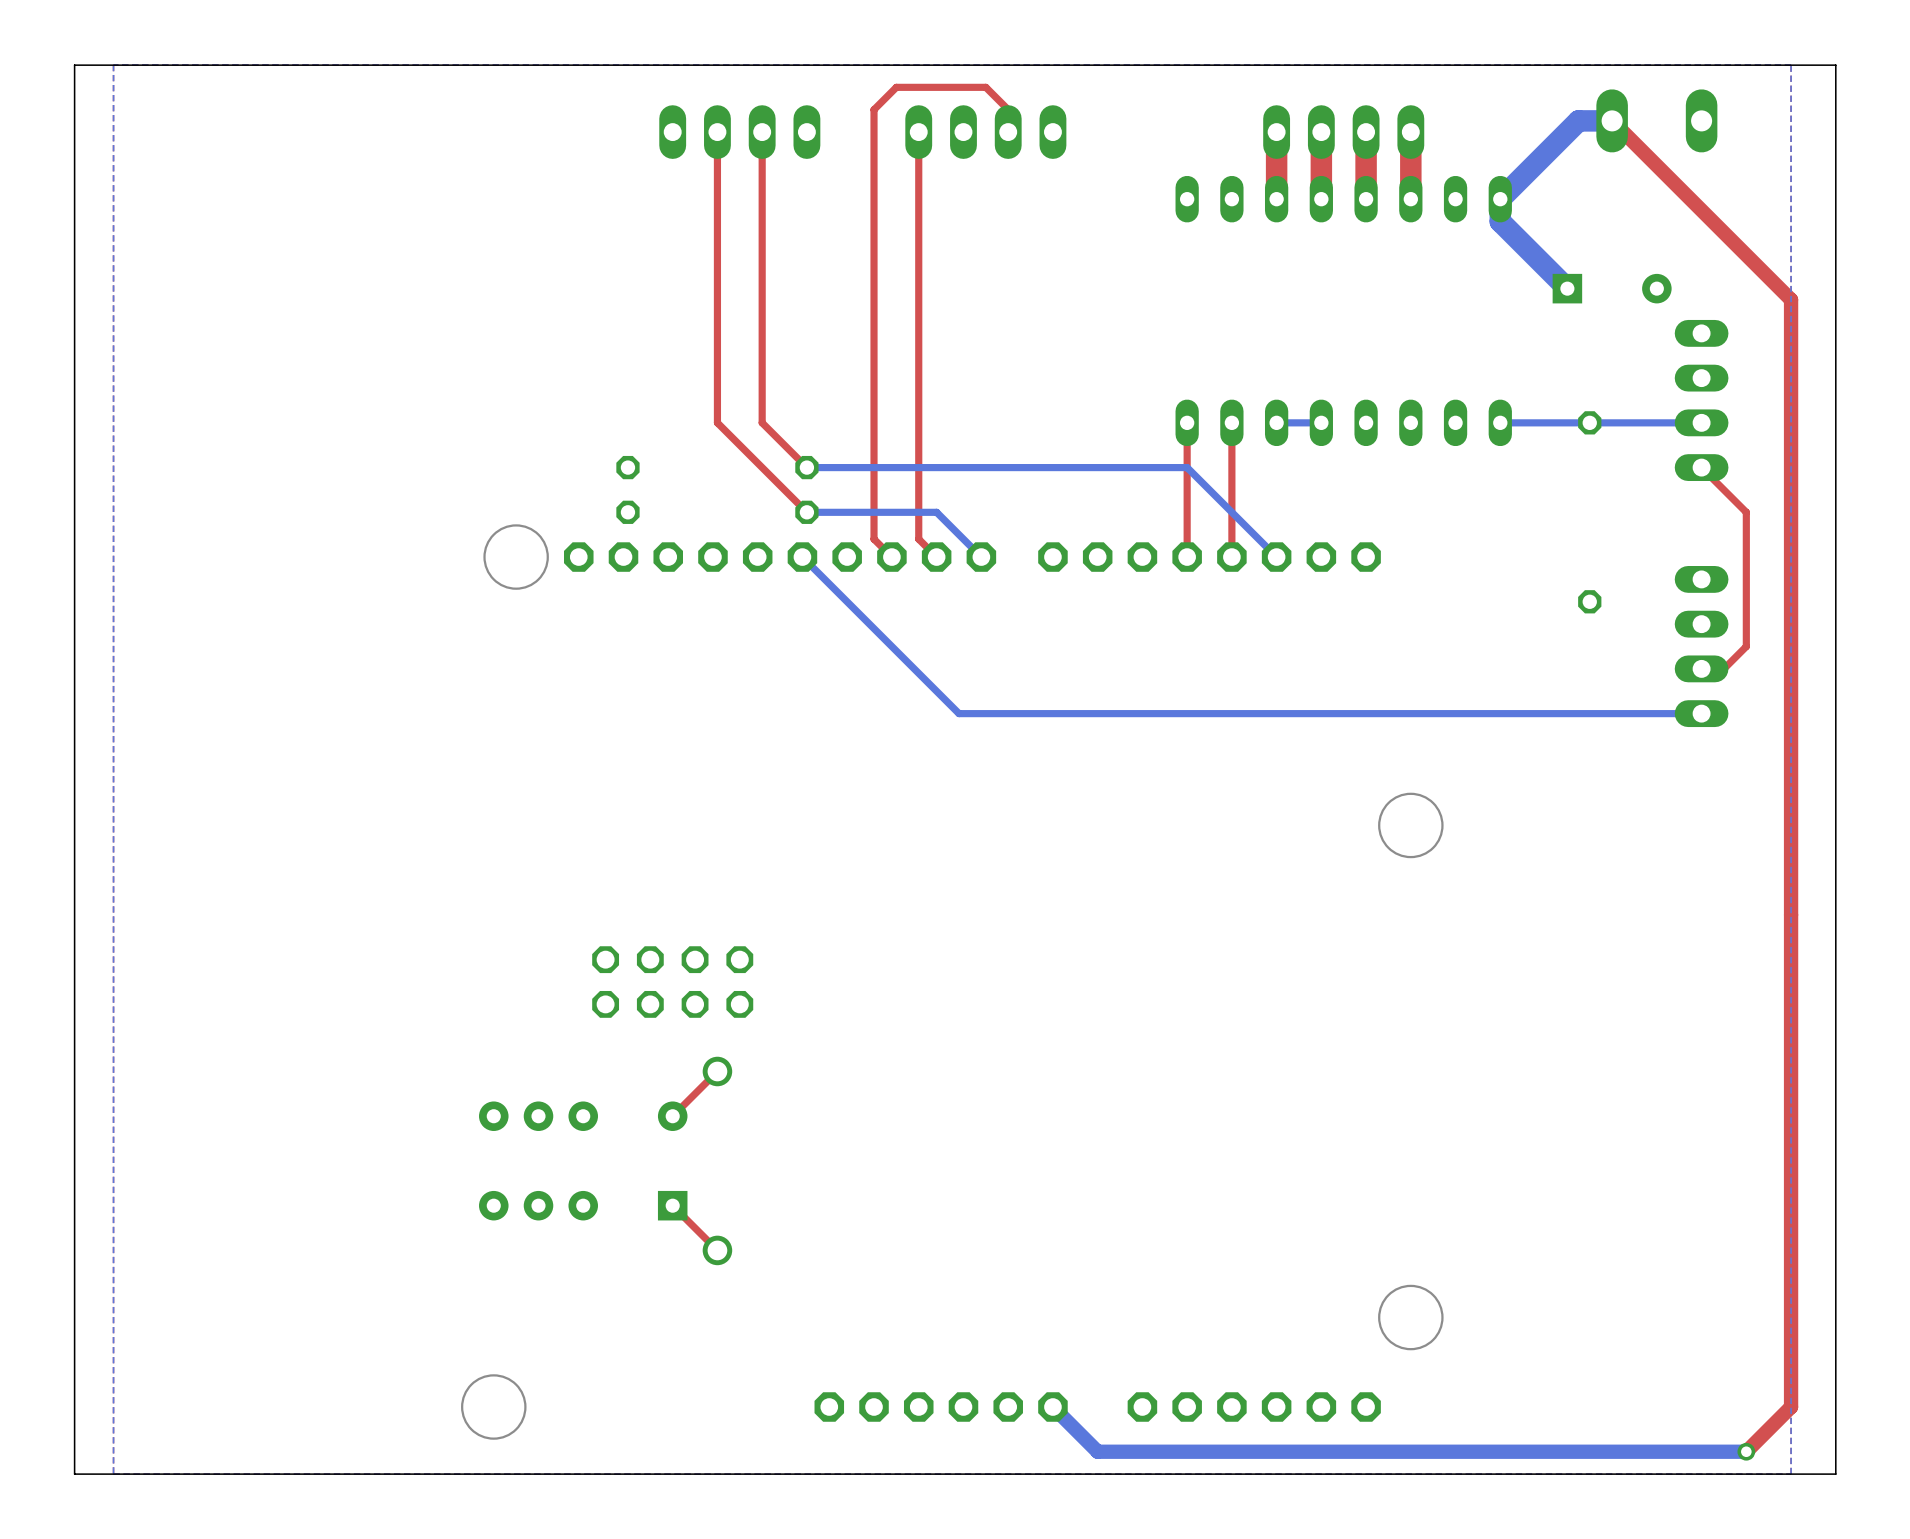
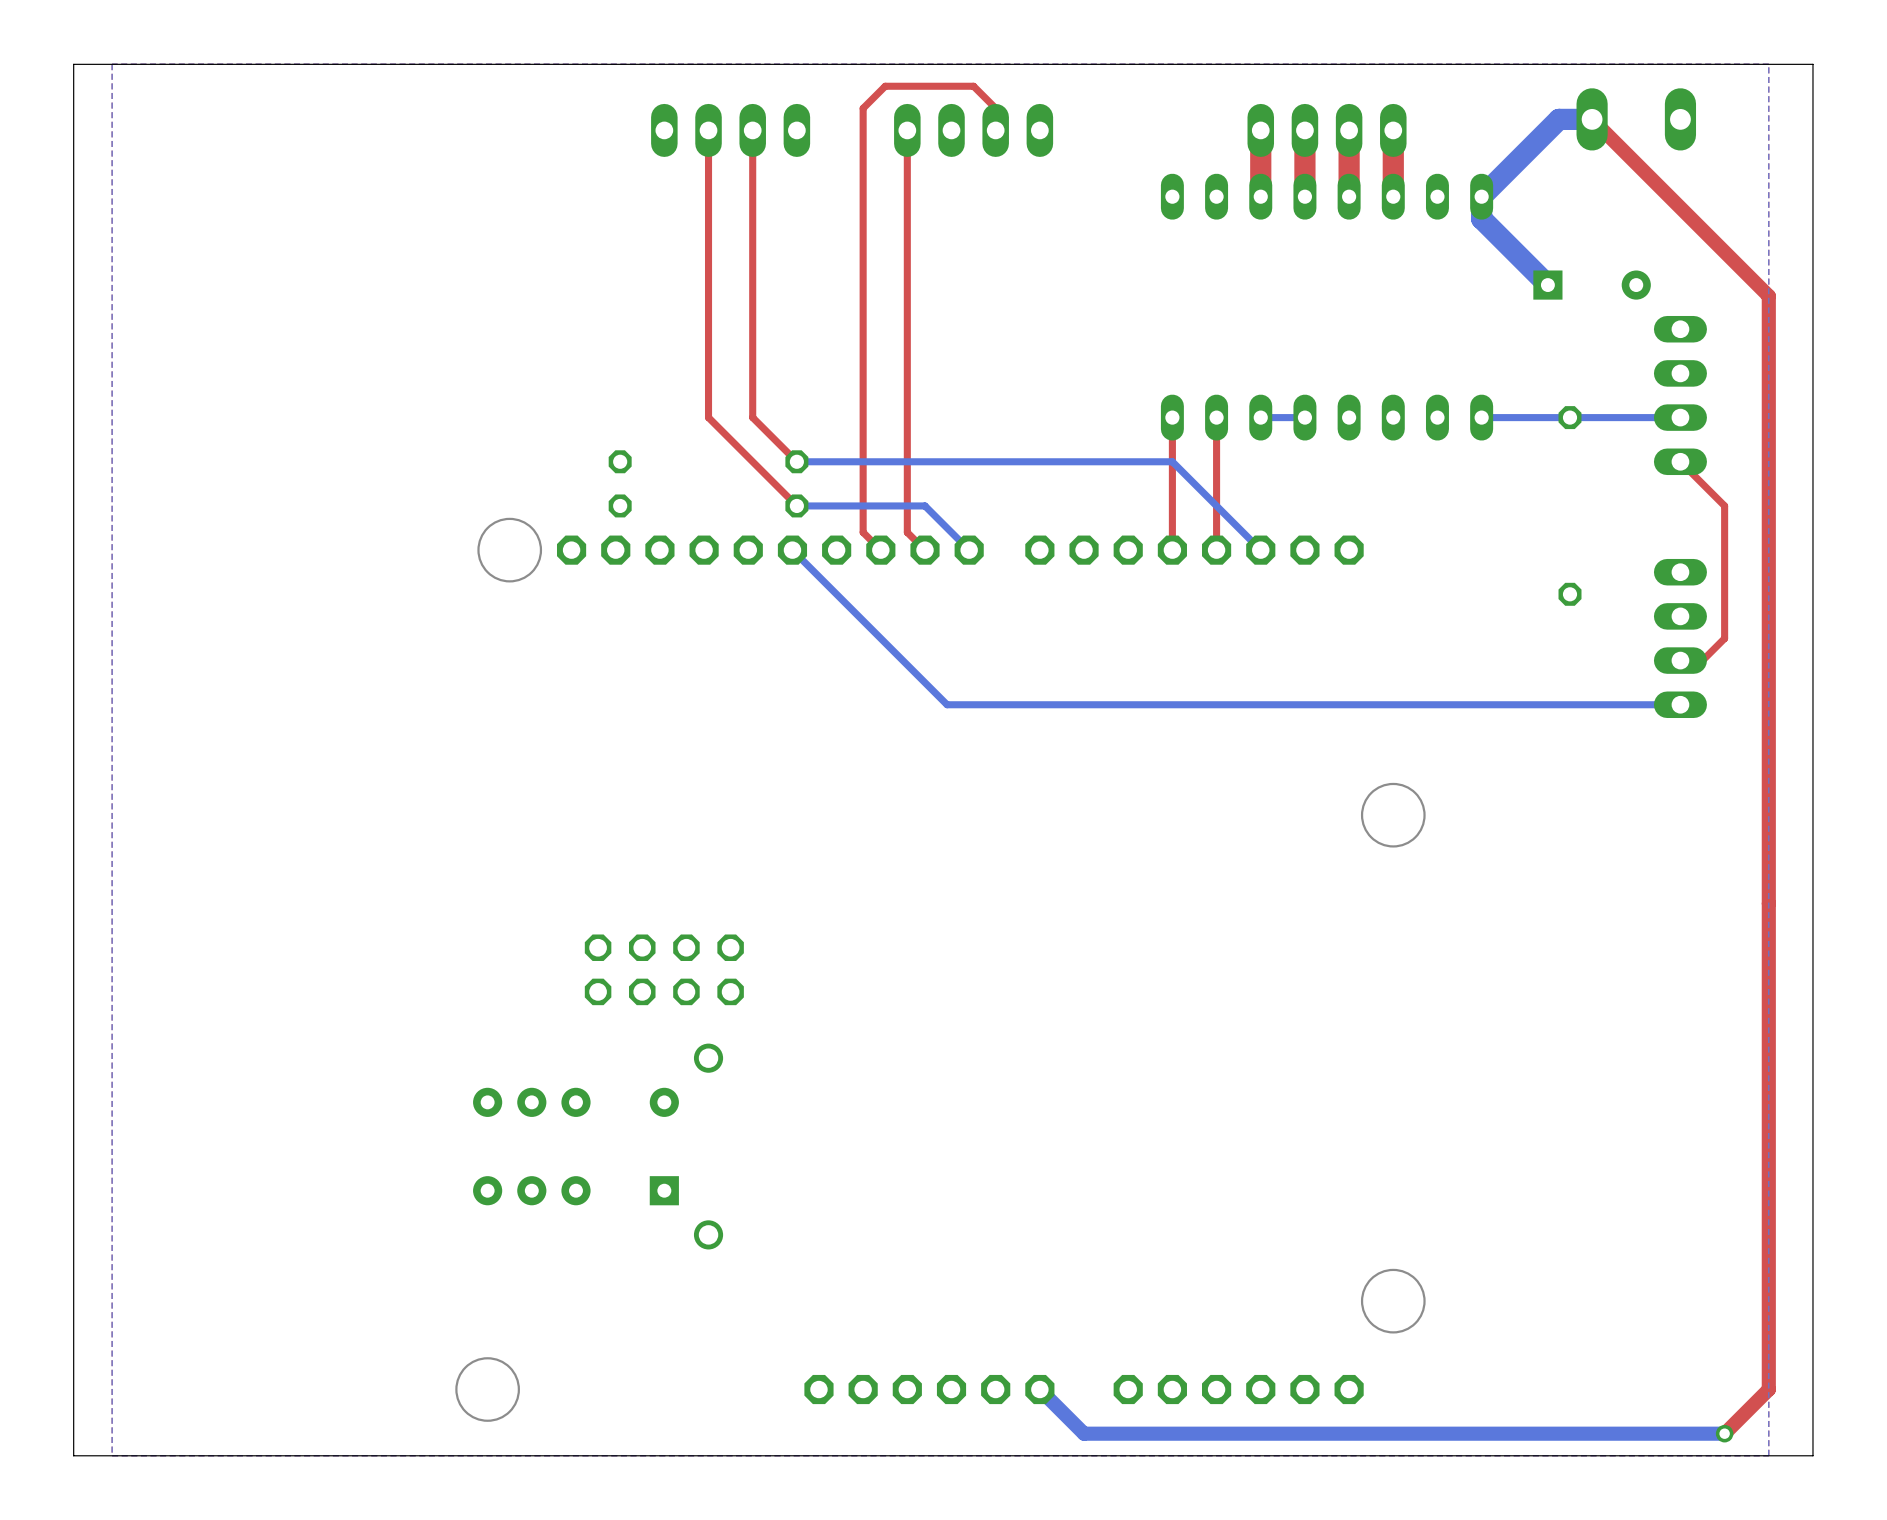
top track: (717, 1071) (672, 1116) -> none
top track: (672, 1205) (717, 1250) -> none

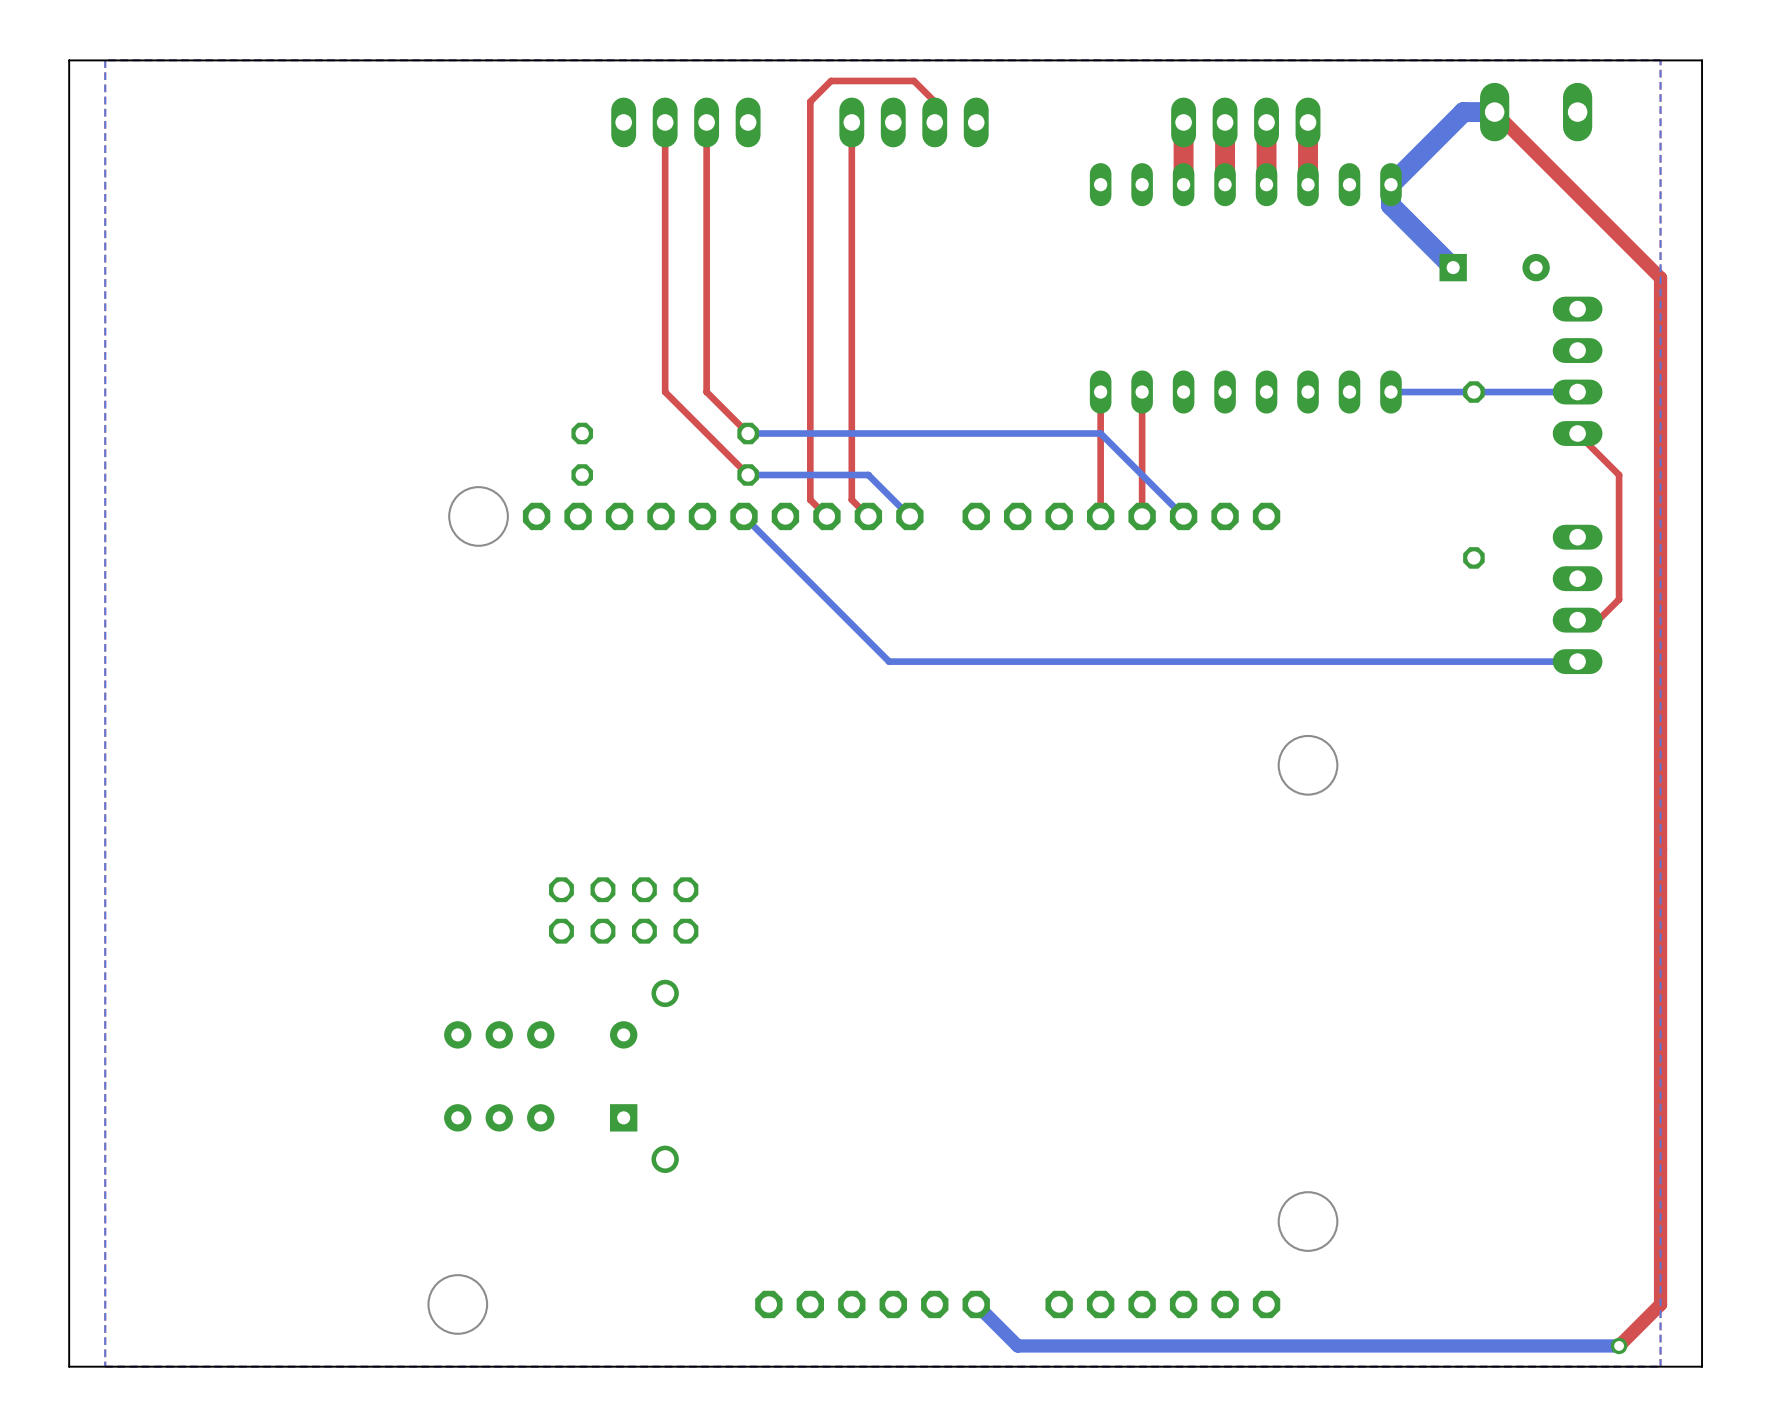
bottom track: (1304, 417) (1260, 417) -> none

